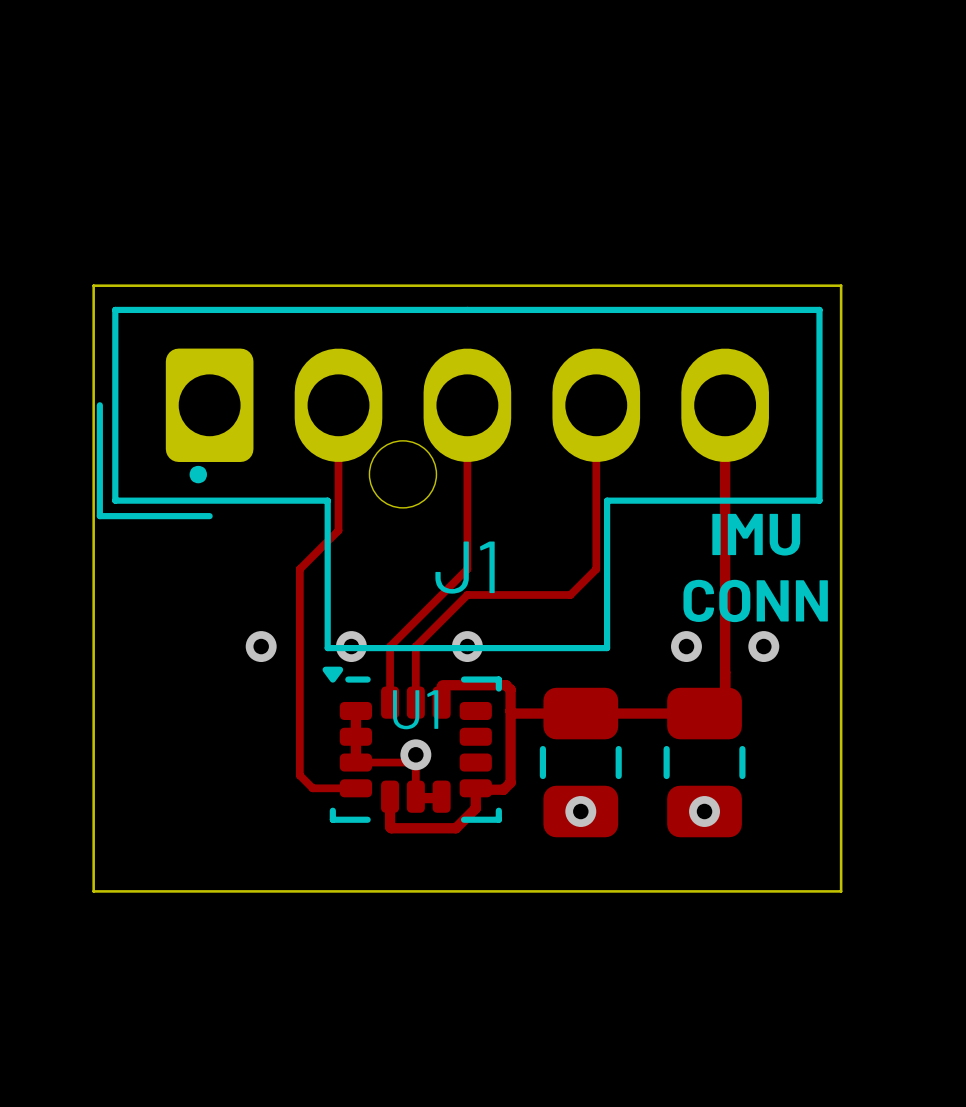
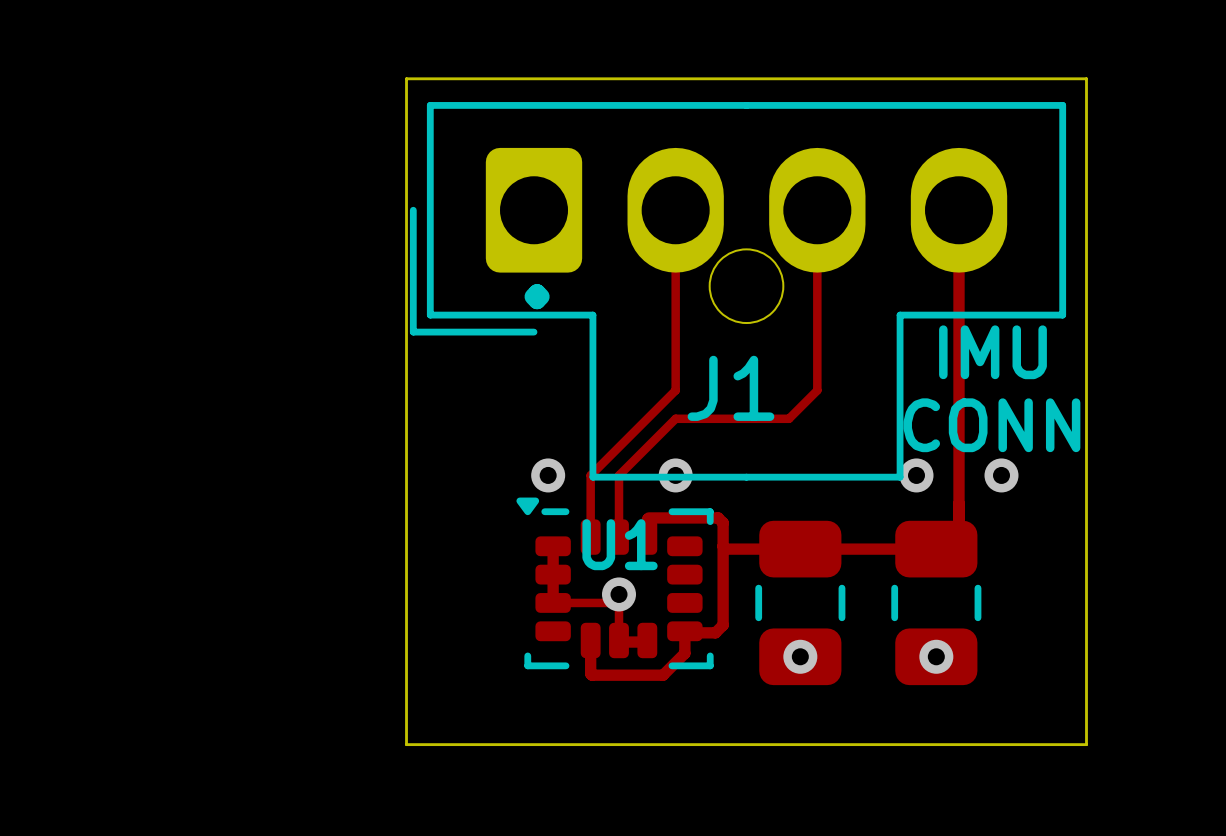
board edge: (222, 285) (93, 285) (93, 891) (222, 891) -> (406, 78) (406, 744)
J1 footprint: [96, 306, 823, 652] -> [409, 102, 1067, 481]
top track: (338, 405) (338, 530) (299, 569) (299, 775) (312, 788) (355, 788) -> none
text position: . (198, 474) -> . (537, 296)
via: (261, 646) -> none

